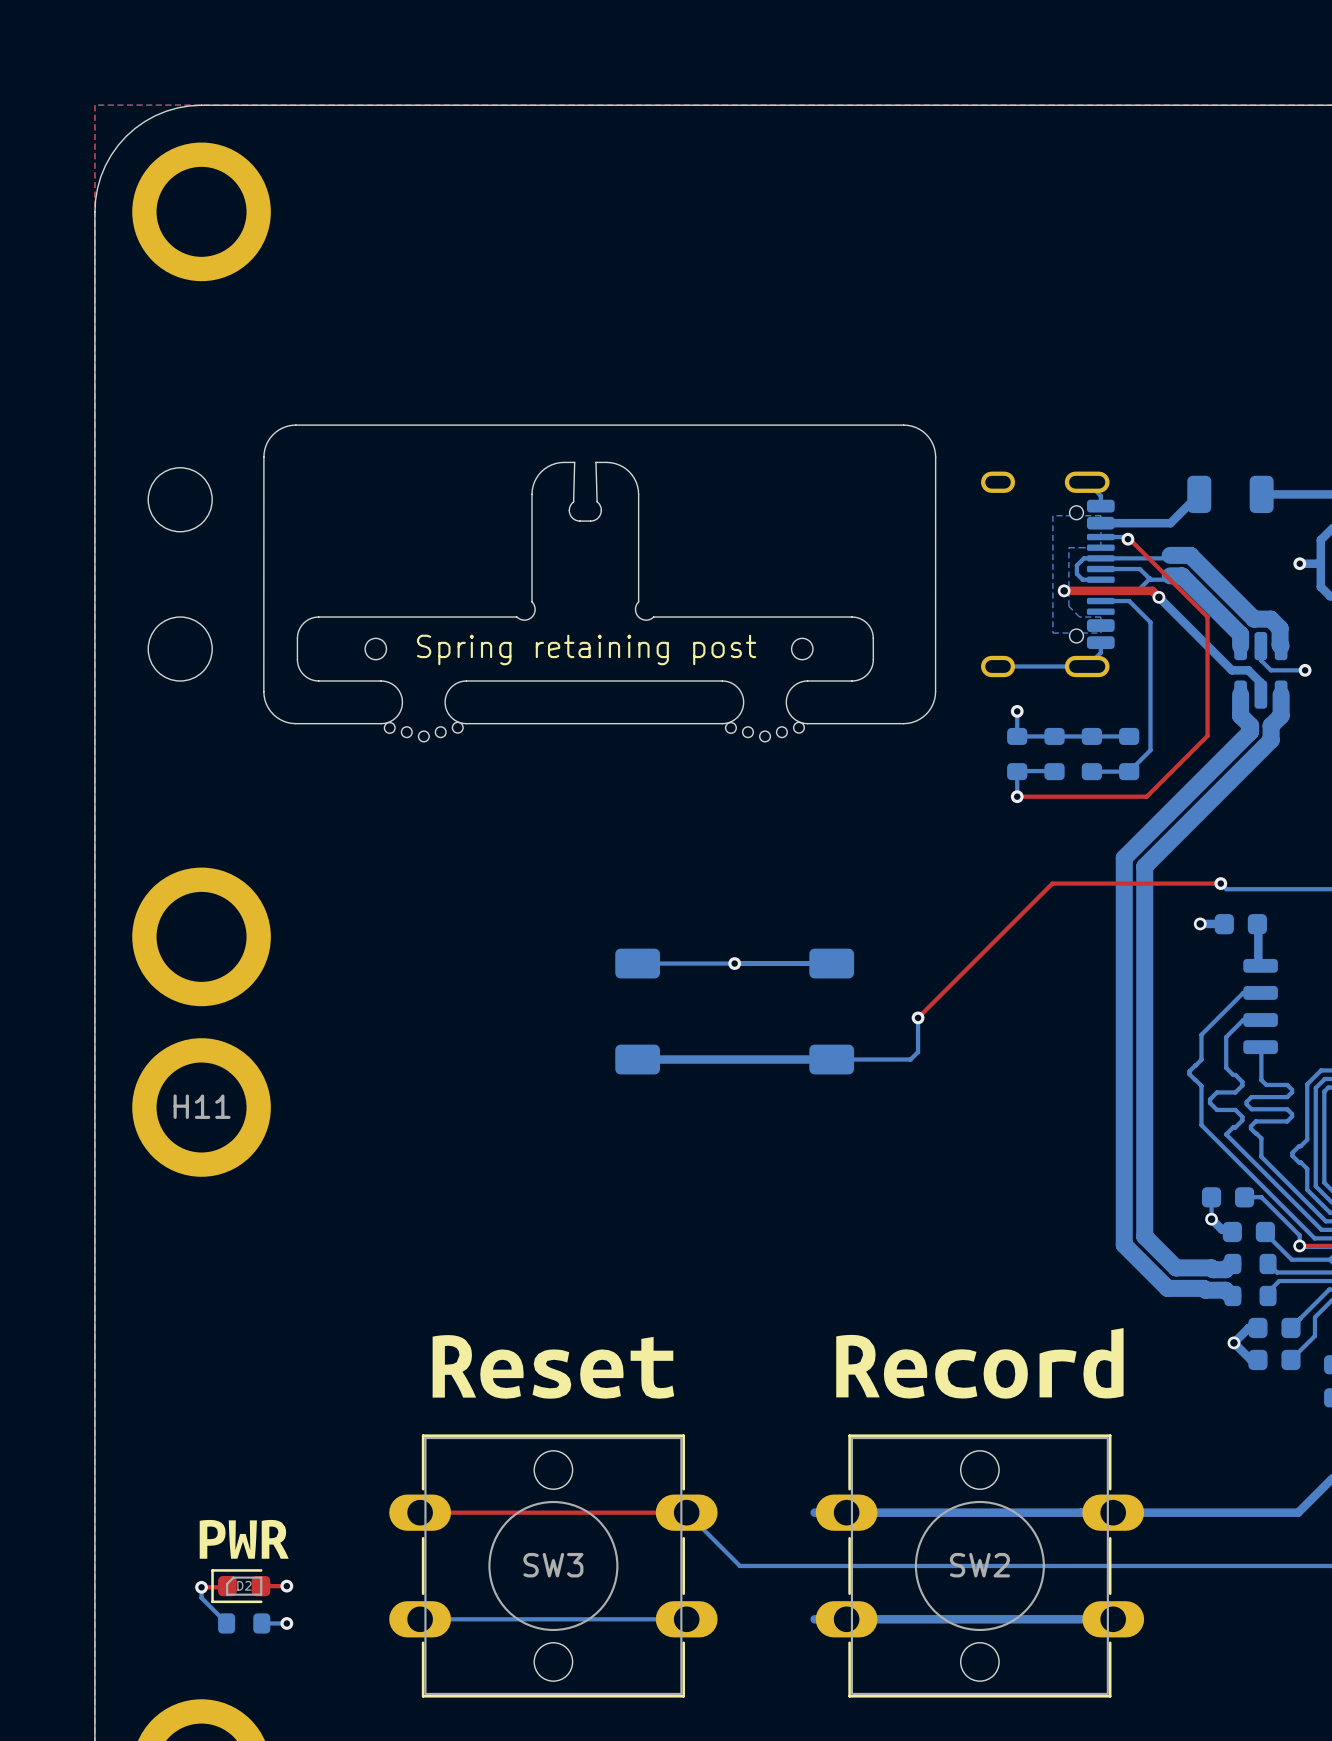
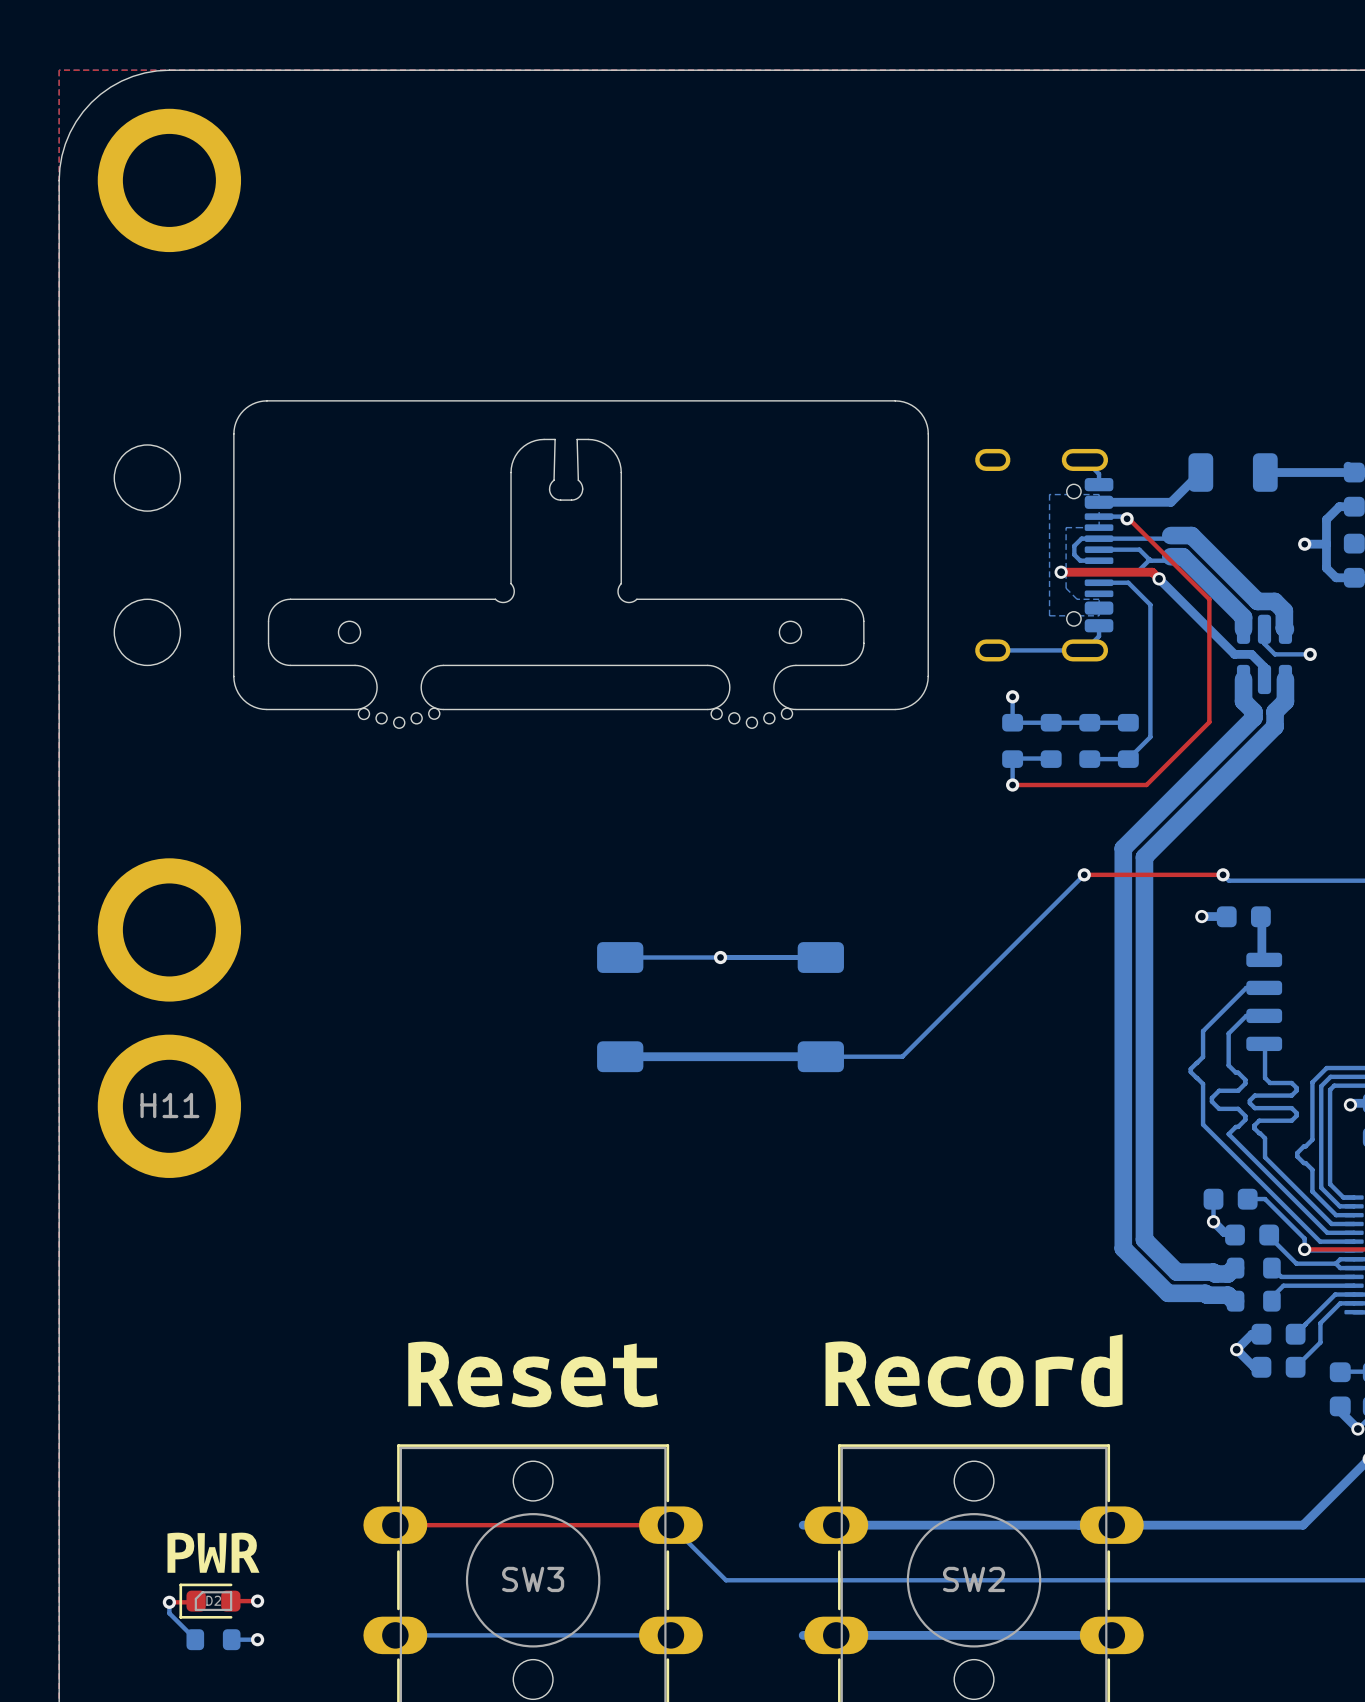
text: Spring retaining post (586, 649) -> none
top track: (1086, 883) (1052, 883) (918, 1017) -> none
via: none -> (1084, 874)
bottom track: (918, 1017) (918, 1052) -> (1084, 874) (910, 1048)
via: (918, 1017) -> none

